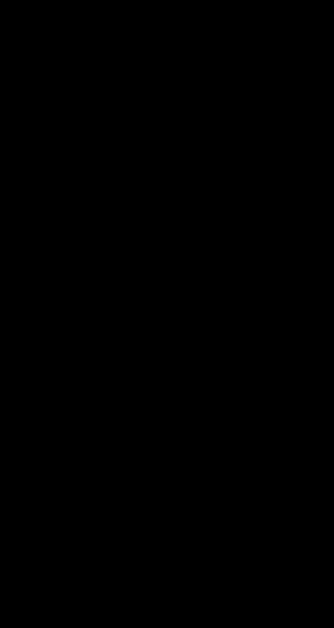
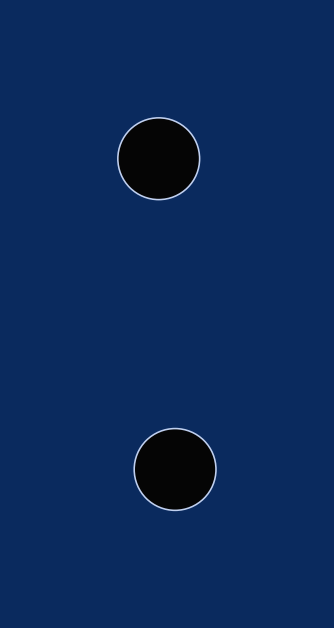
part: none -> (158, 158)
part: none -> (175, 469)

